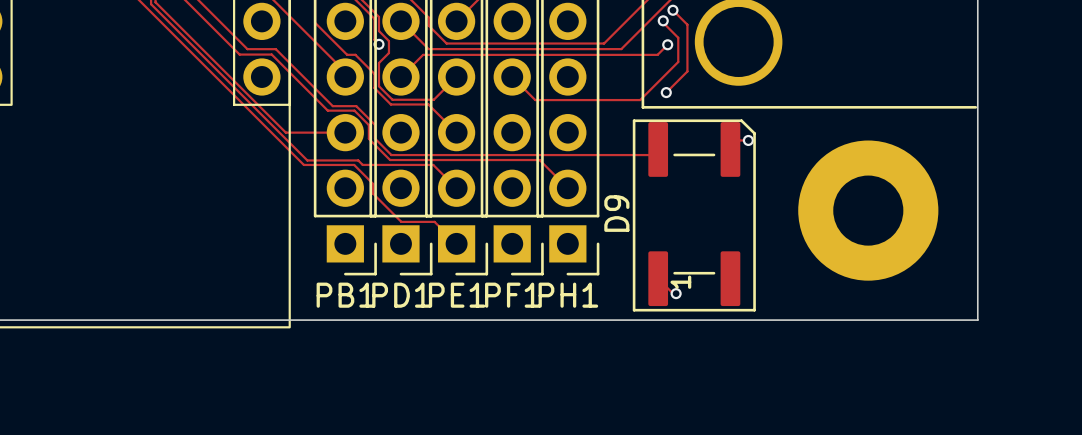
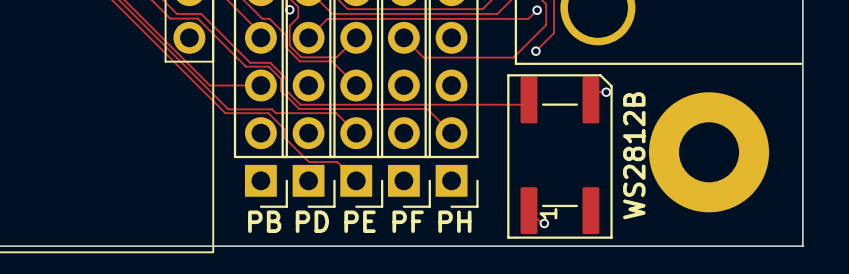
D9 name: D9 (616, 213) -> none
D9 value: none -> WS2812B (634, 155)
PB1 value: none -> PB (264, 221)
PD1 value: none -> PD (312, 221)
PE1 value: none -> PE (360, 221)
PF1 value: none -> PF (408, 221)
PH1 value: none -> PH (454, 221)
PB1 name: PB1 (345, 295) -> none
PD1 name: PD1 (401, 295) -> none
PE1 name: PE1 (457, 295) -> none
PF1 name: PF1 (512, 295) -> none
PH1 name: PH1 (568, 295) -> none

